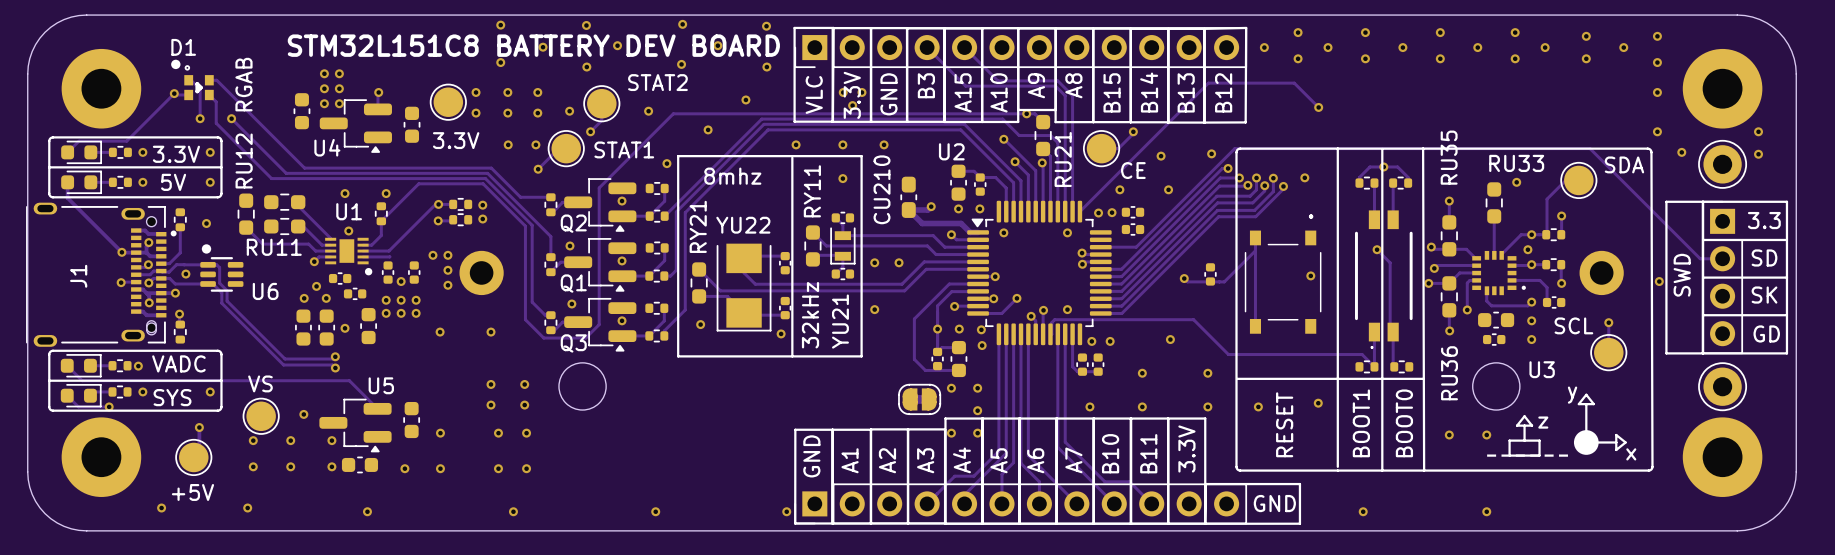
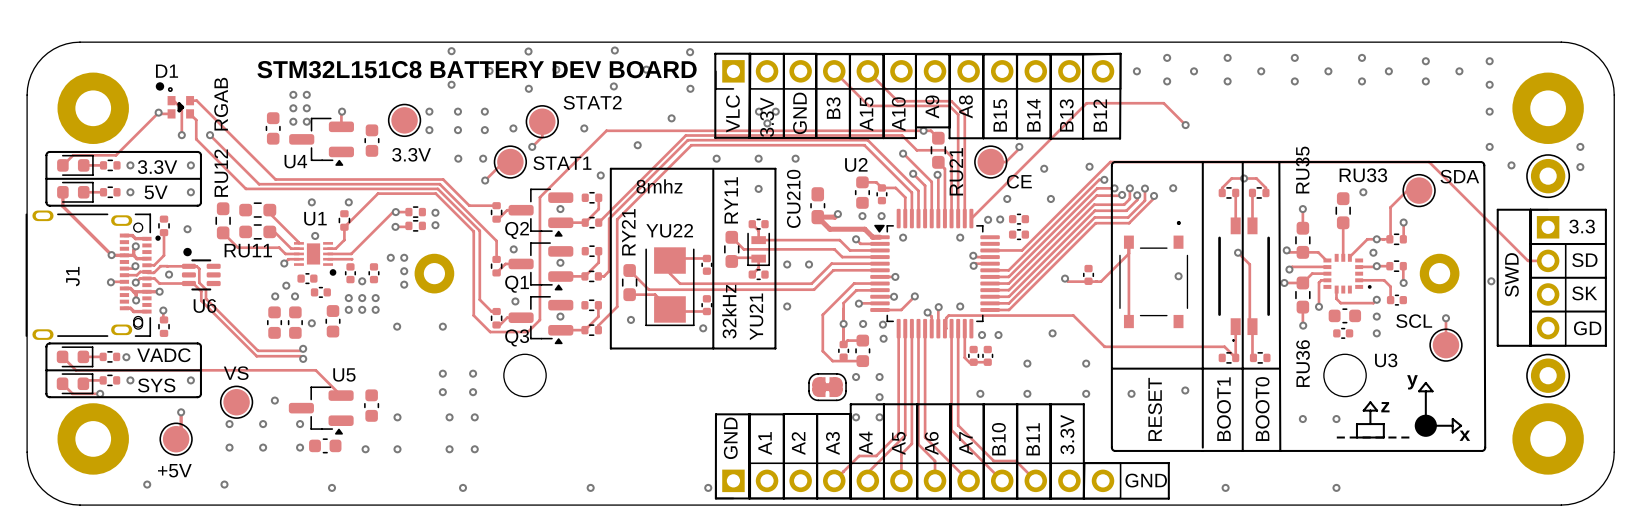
U6 name position: U6 (265, 291) -> U6 (204, 305)

